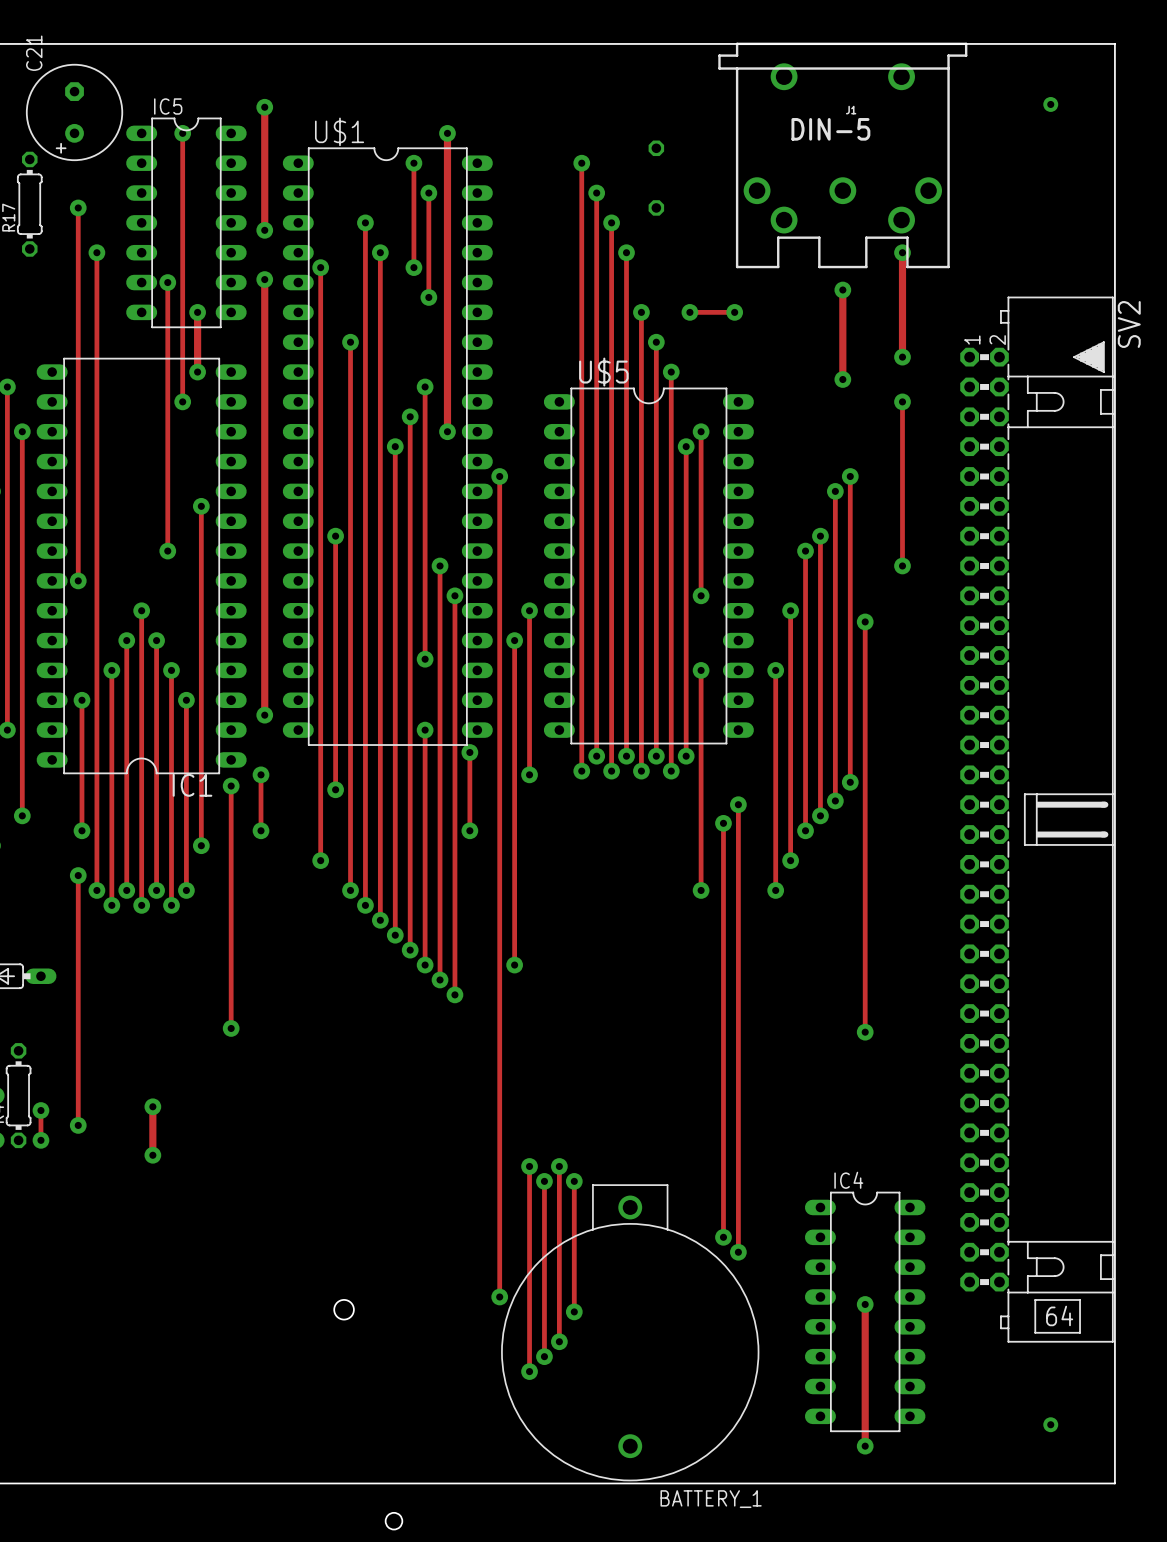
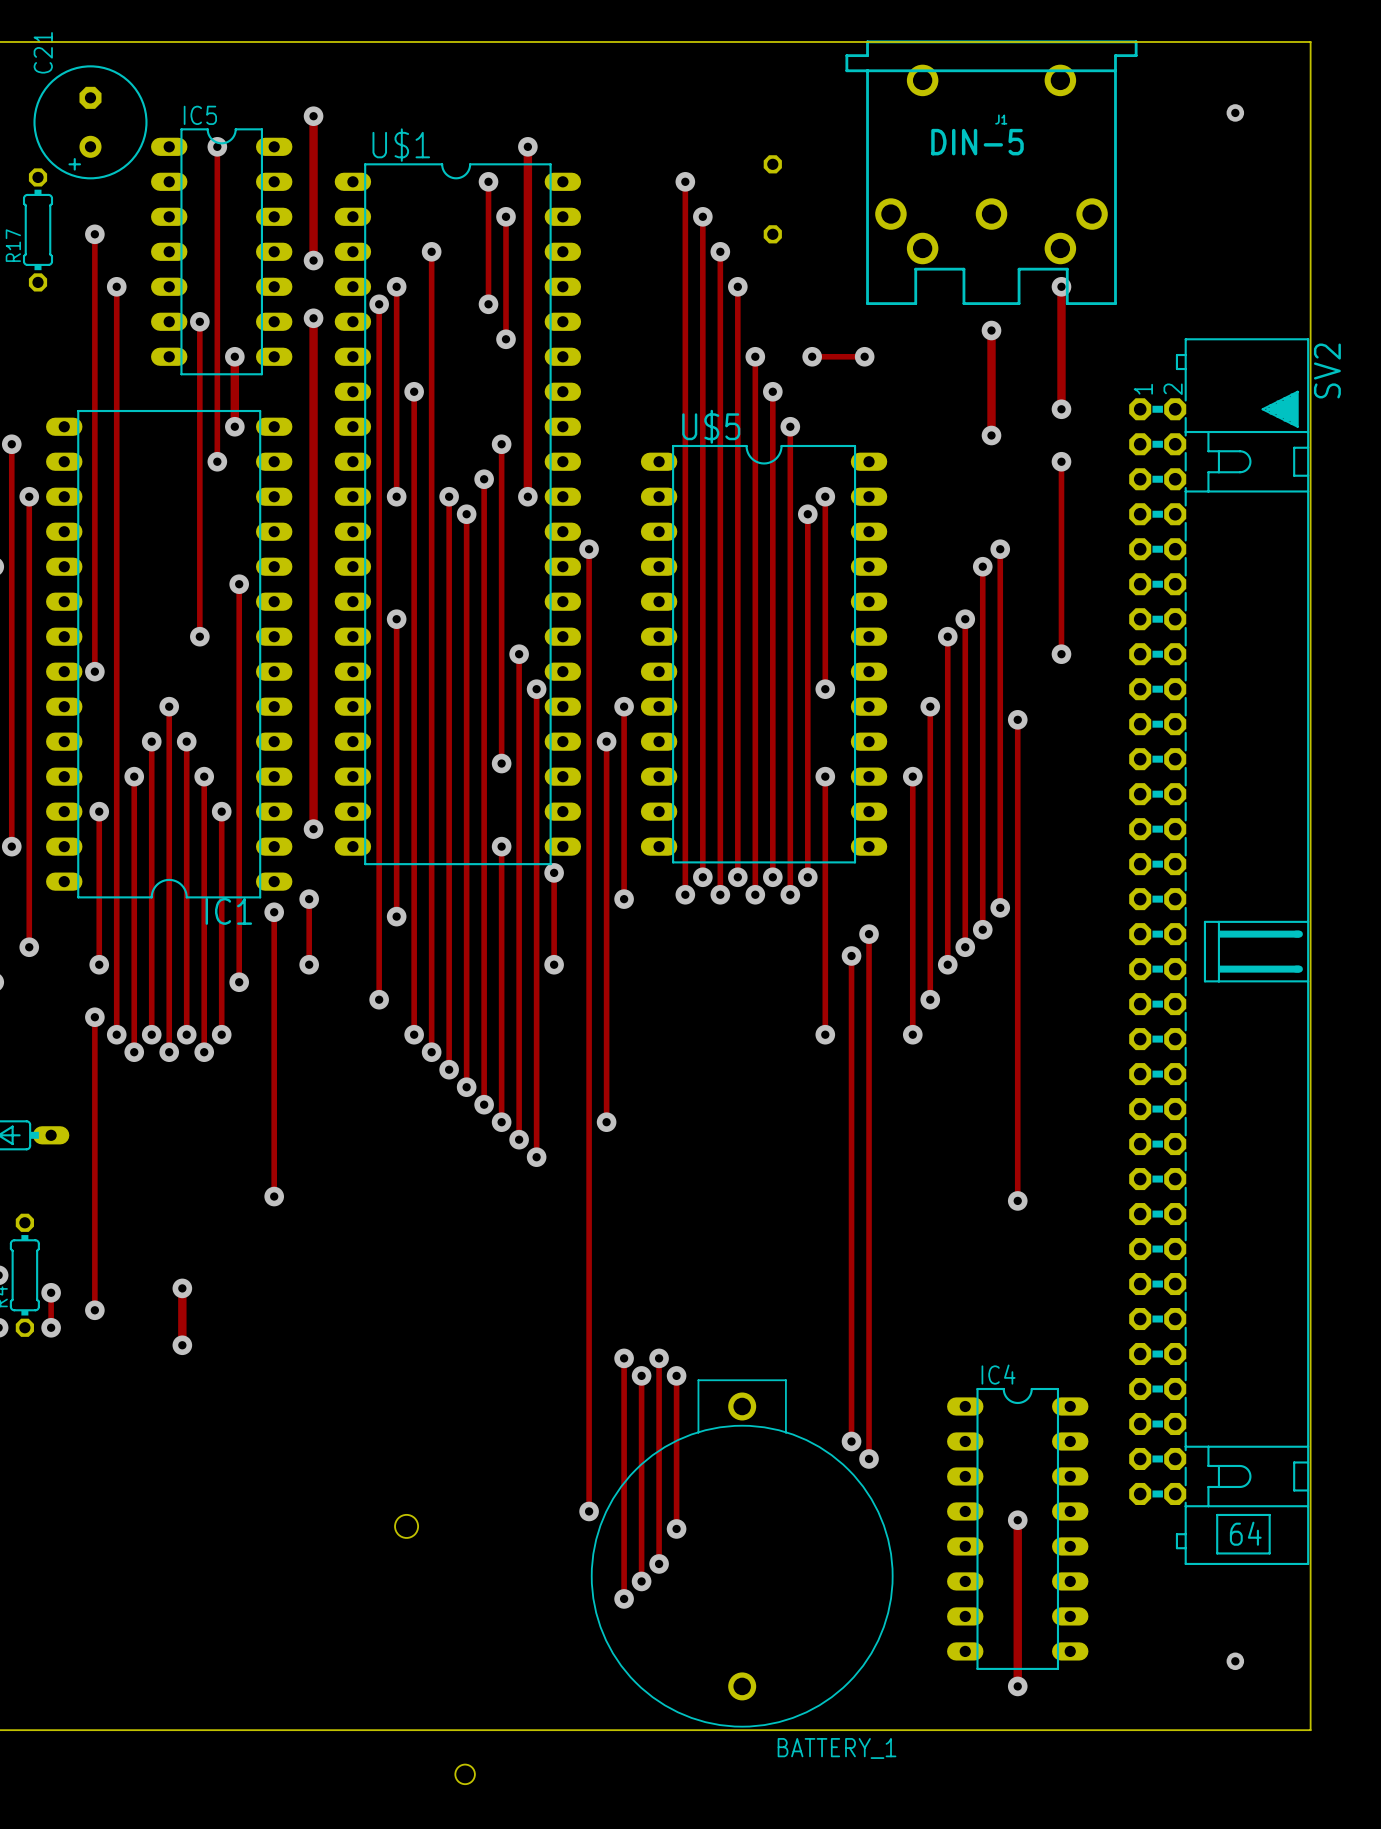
track: (380, 252) (380, 431) -> (396, 286) (396, 496)
via position: (380, 252) -> (396, 286)
via: none -> (396, 496)
via: none -> (449, 496)

